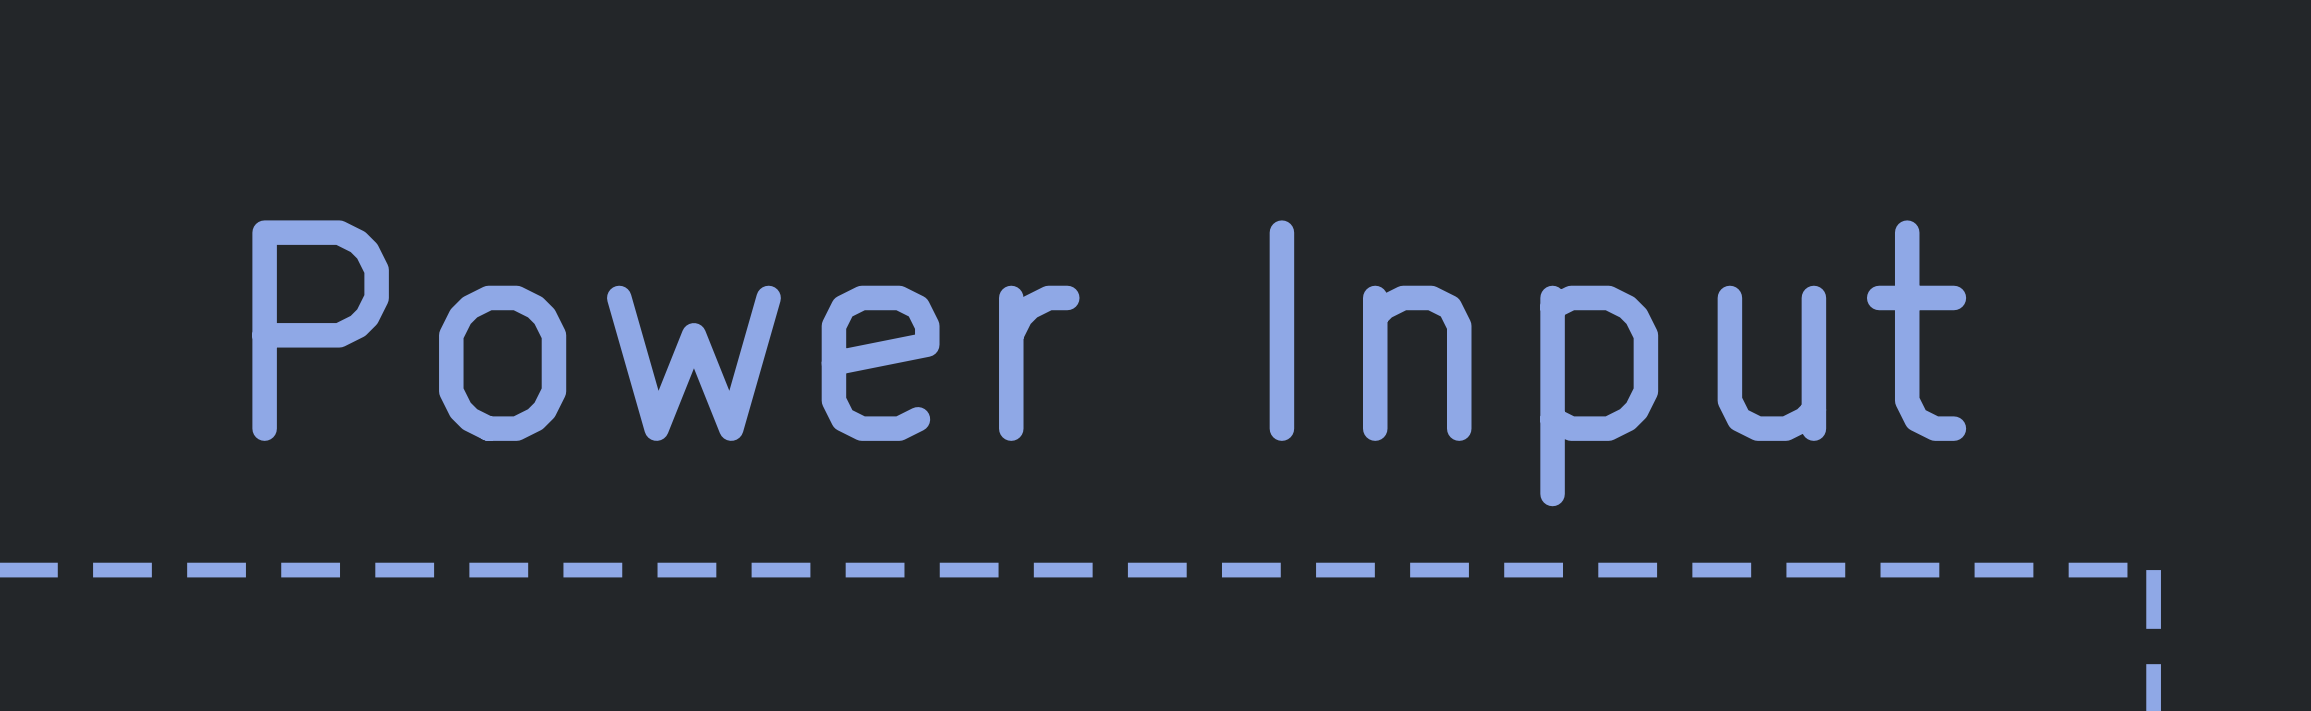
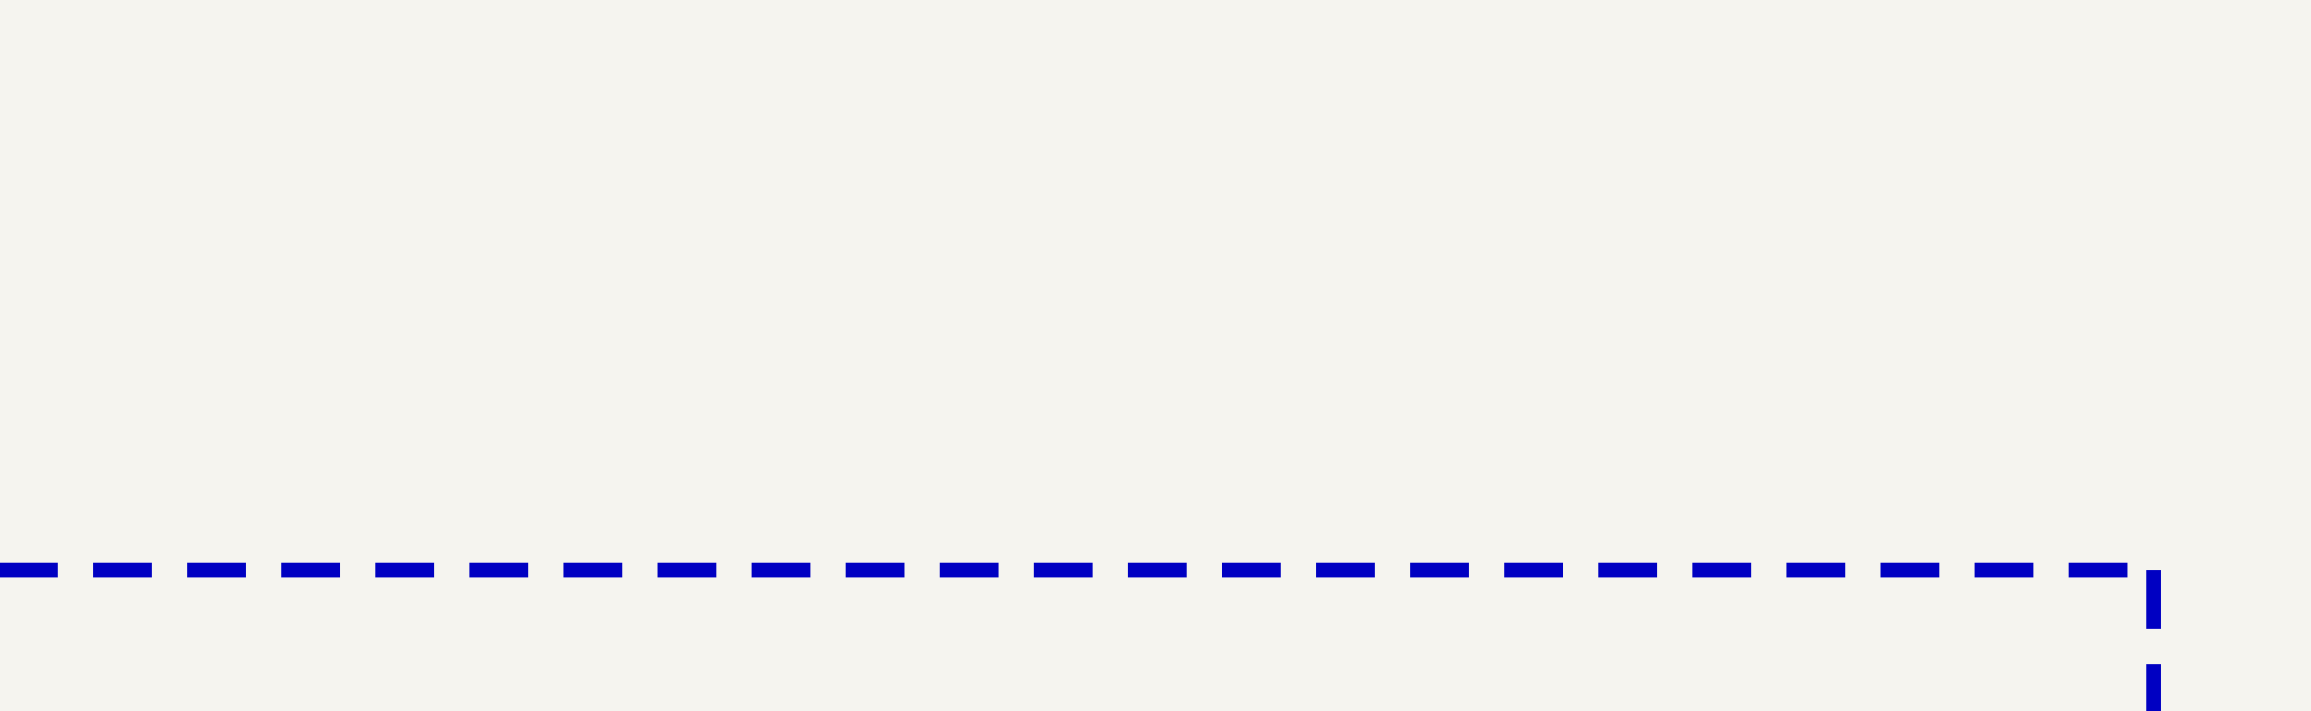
text: Power Input (1109, 363) -> none

